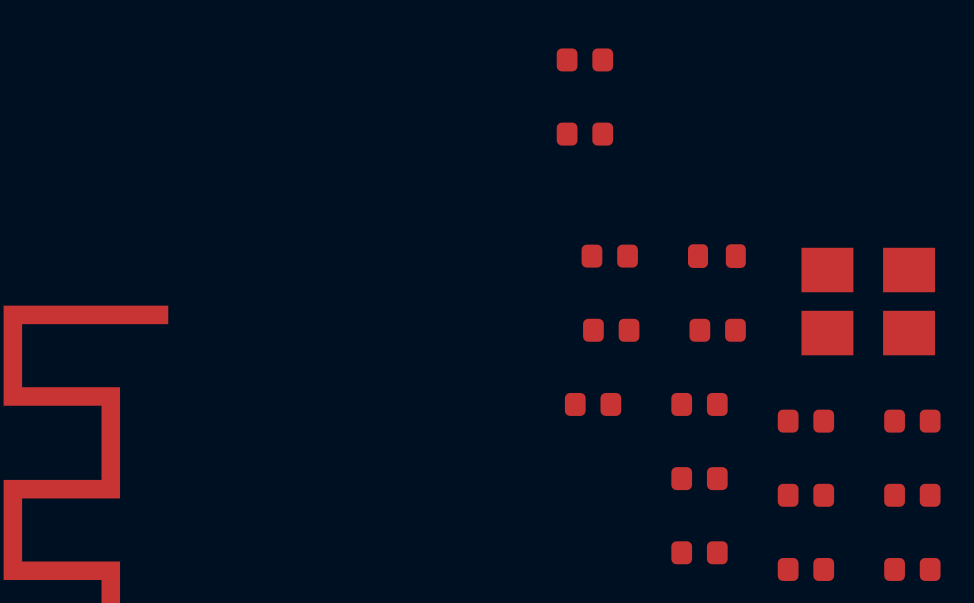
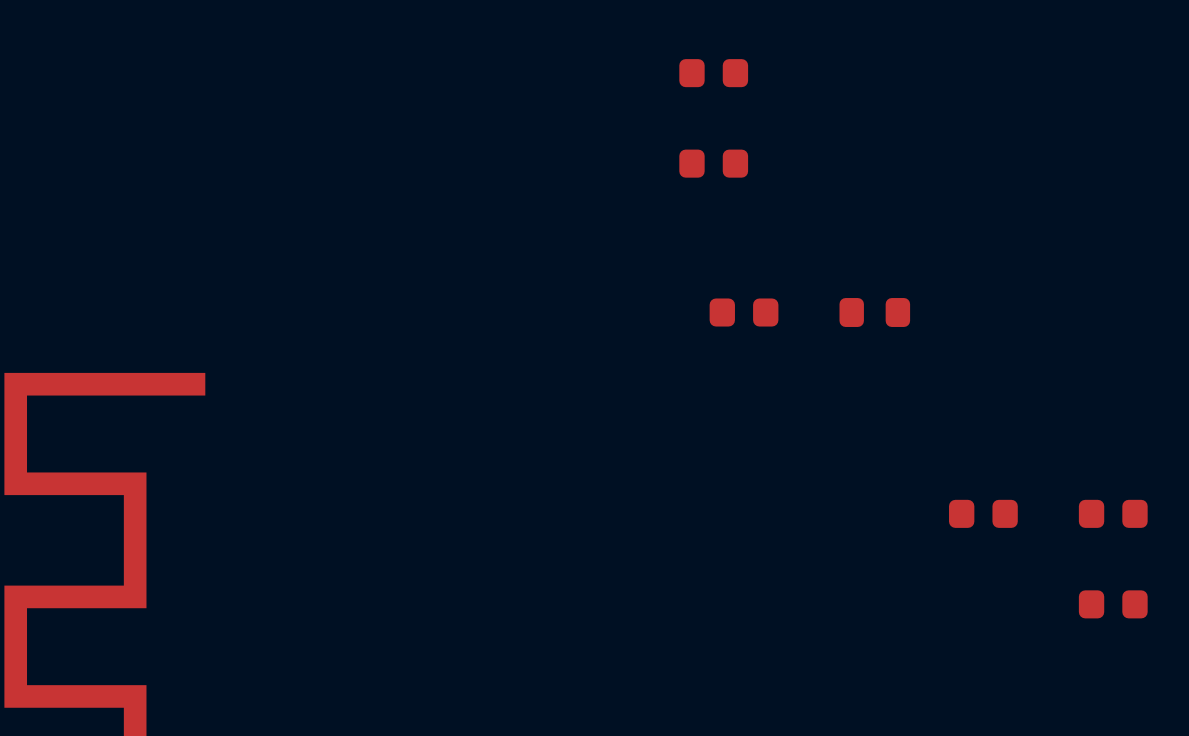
part: (868, 301) -> none
part: (611, 330) -> none
part: (717, 330) -> none
part: (593, 404) -> none
part: (699, 404) -> none
part: (699, 478) -> none
part: (805, 495) -> none
part: (699, 552) -> none
part: (805, 569) -> none
part: (912, 569) -> none

